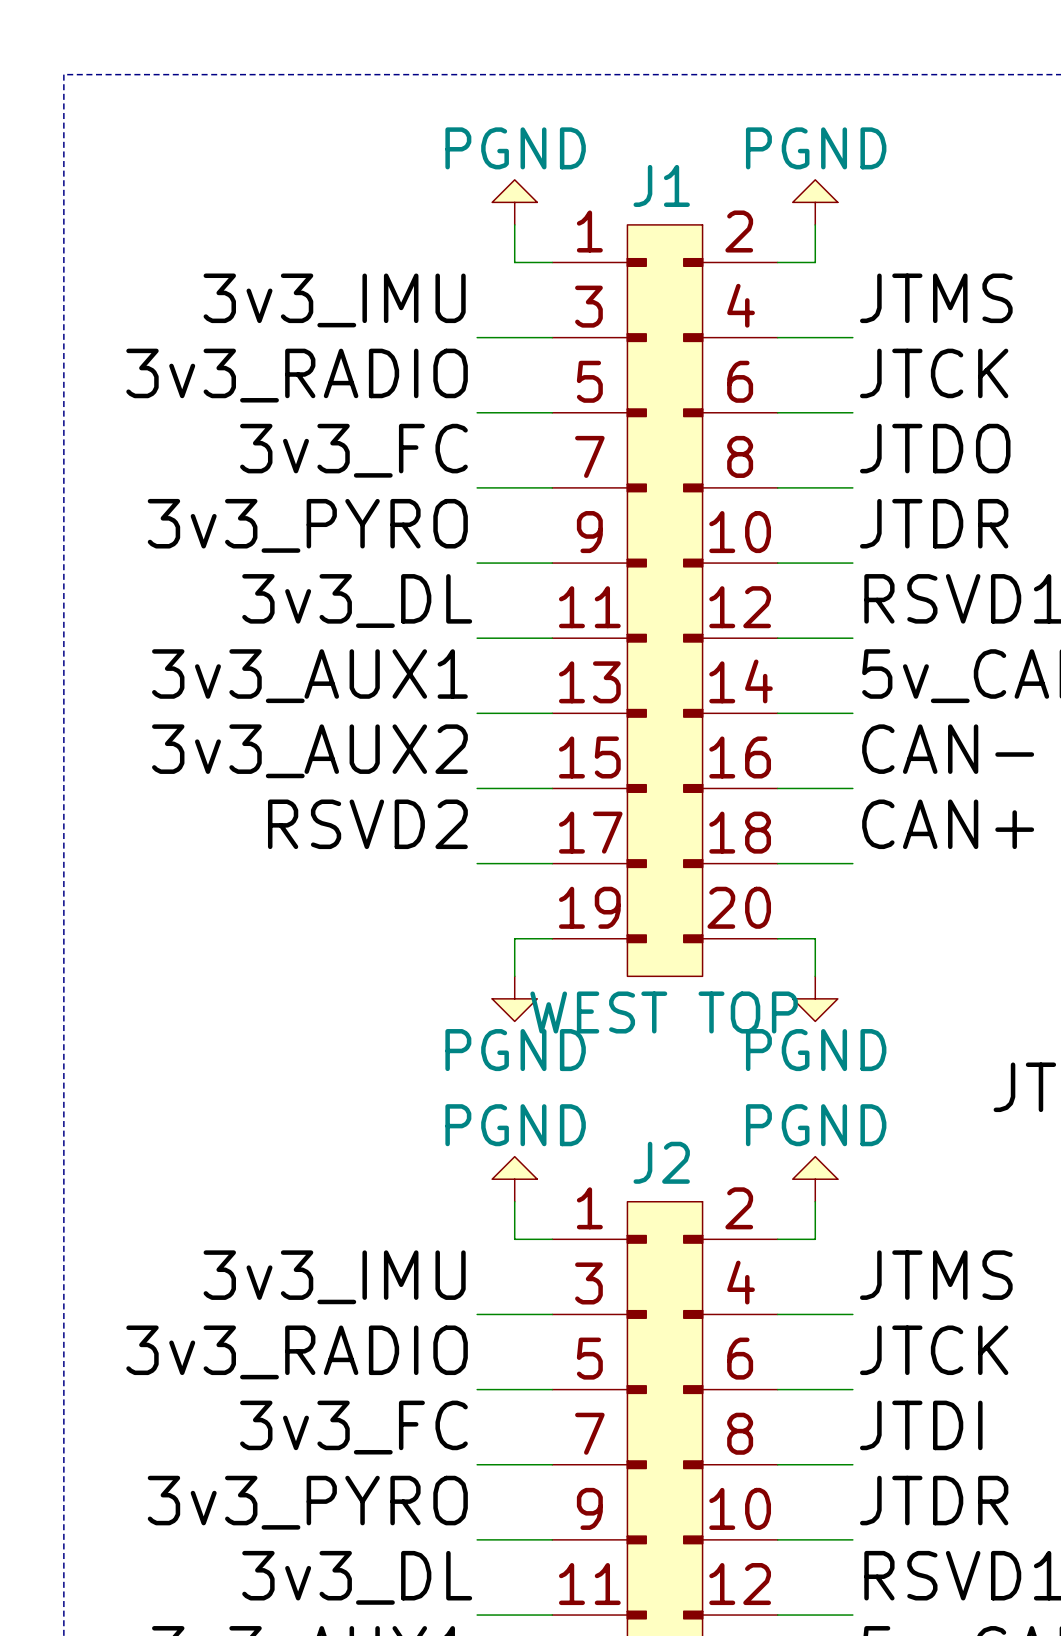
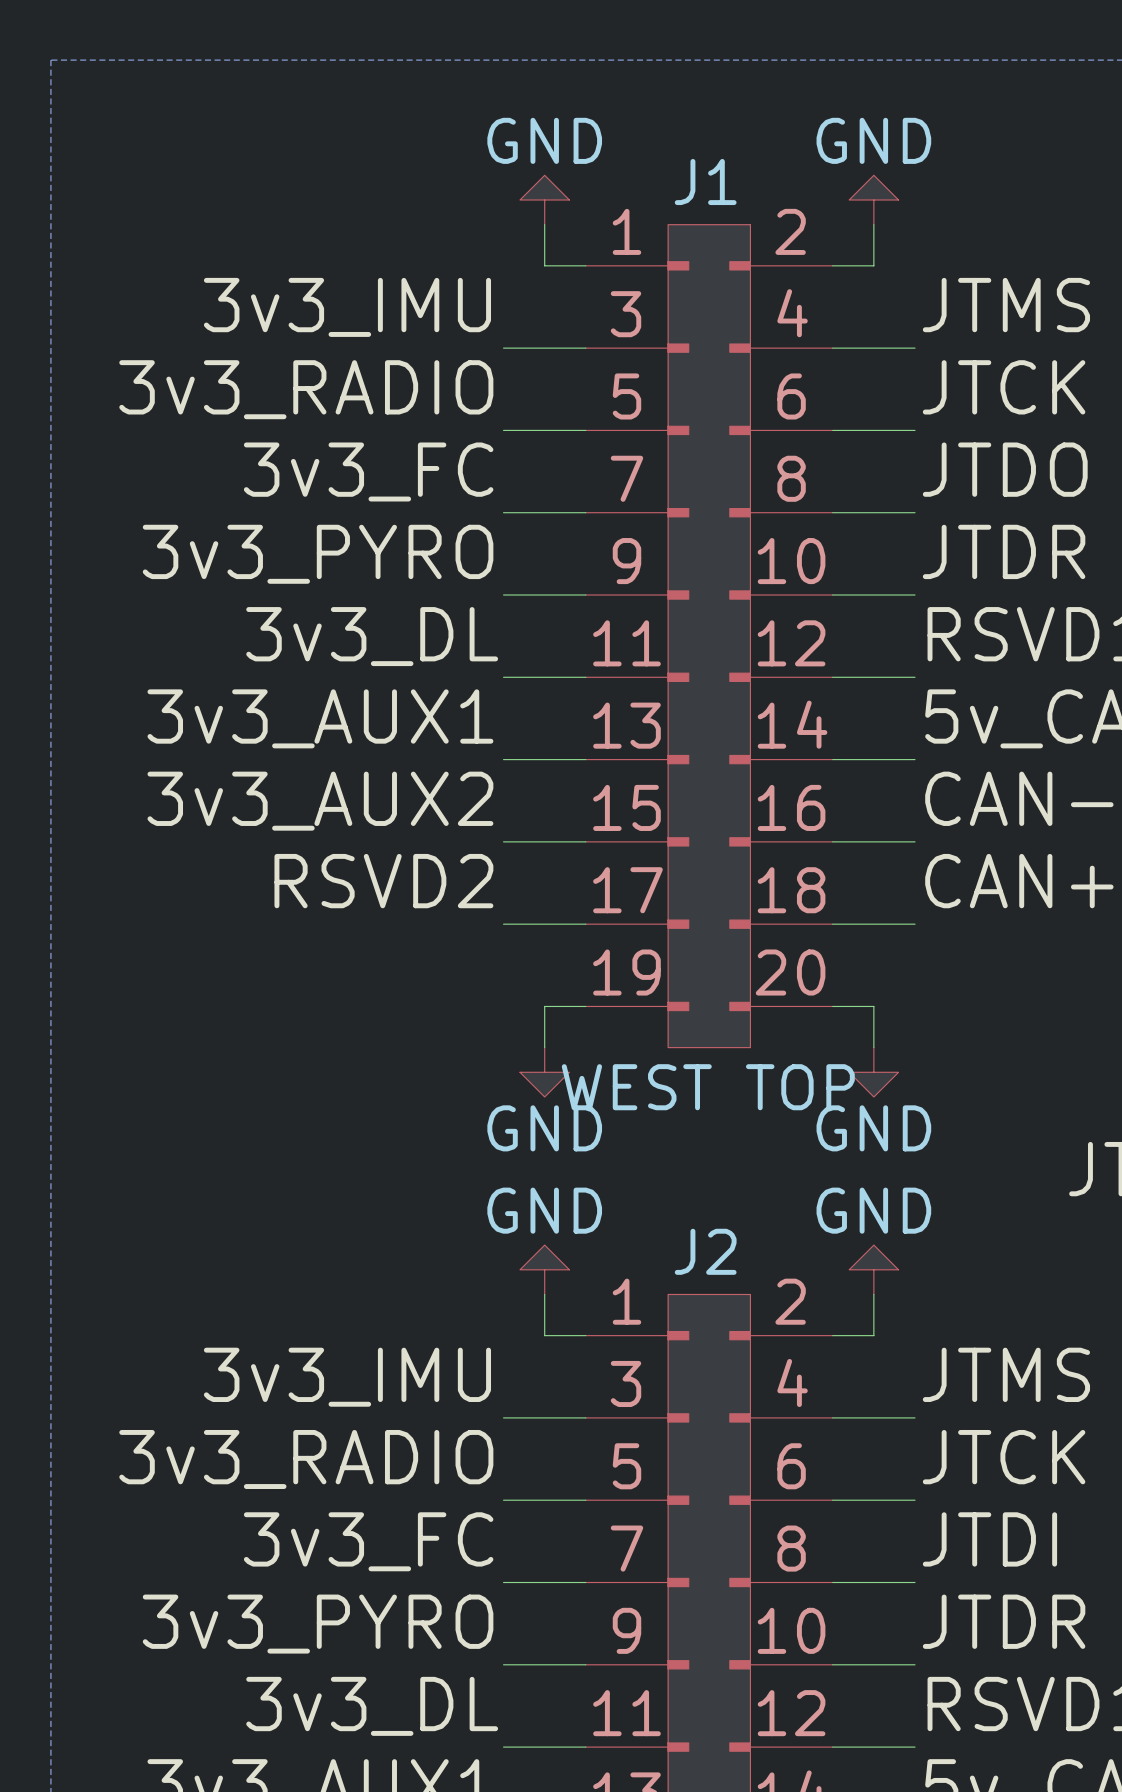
power symbol: PGND (514, 202) -> GND (544, 200)
power symbol: PGND (815, 202) -> GND (873, 200)
power symbol: PGND (514, 998) -> GND (544, 1072)
power symbol: PGND (815, 998) -> GND (873, 1072)
power symbol: PGND (514, 1179) -> GND (544, 1269)
power symbol: PGND (815, 1179) -> GND (873, 1269)

